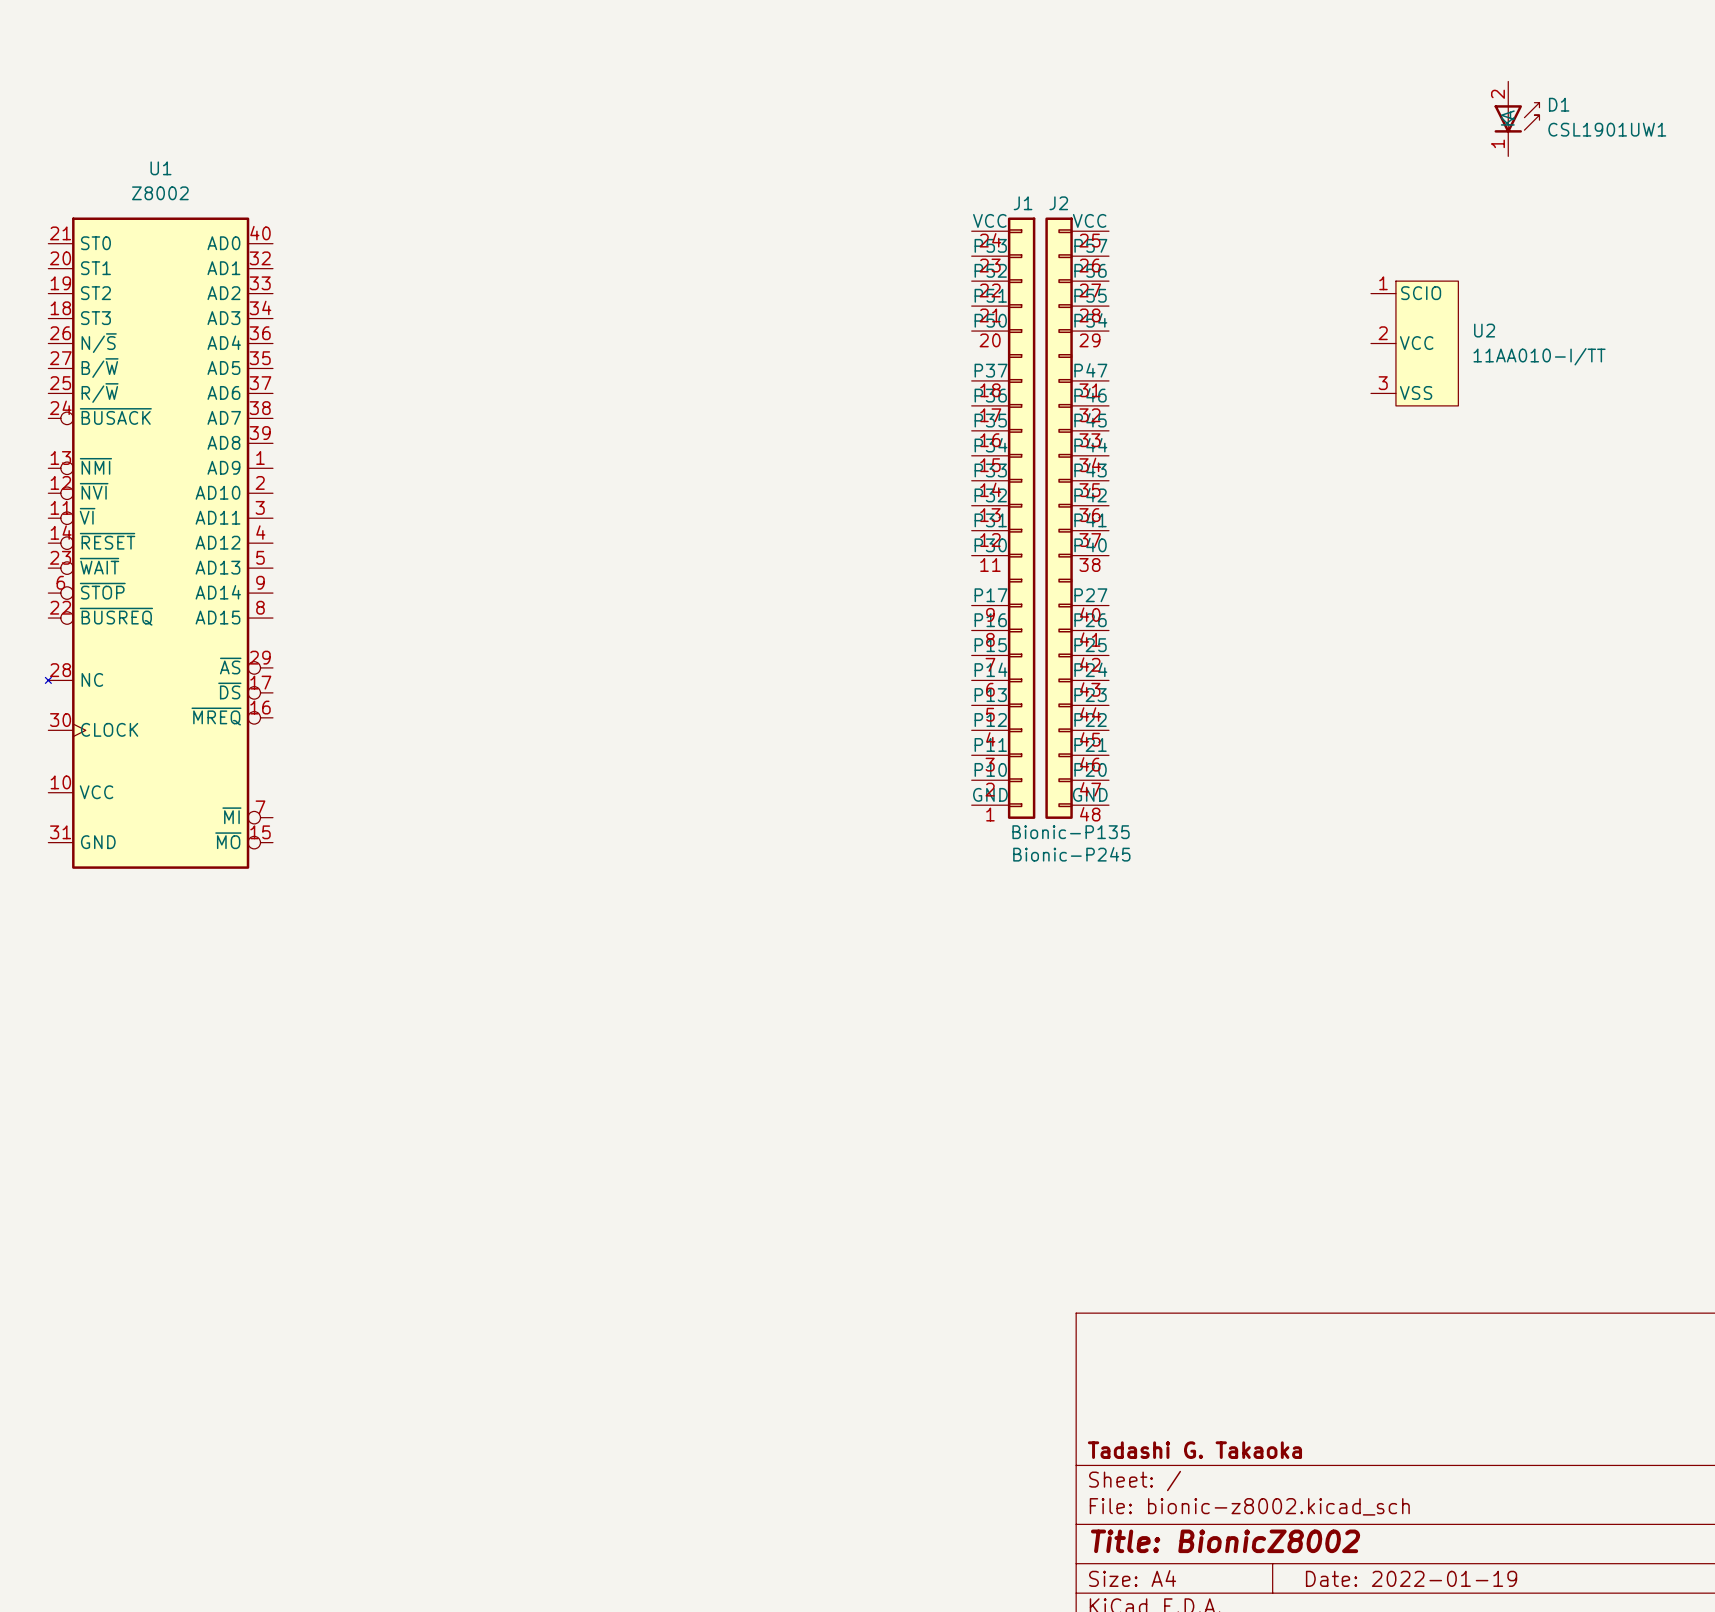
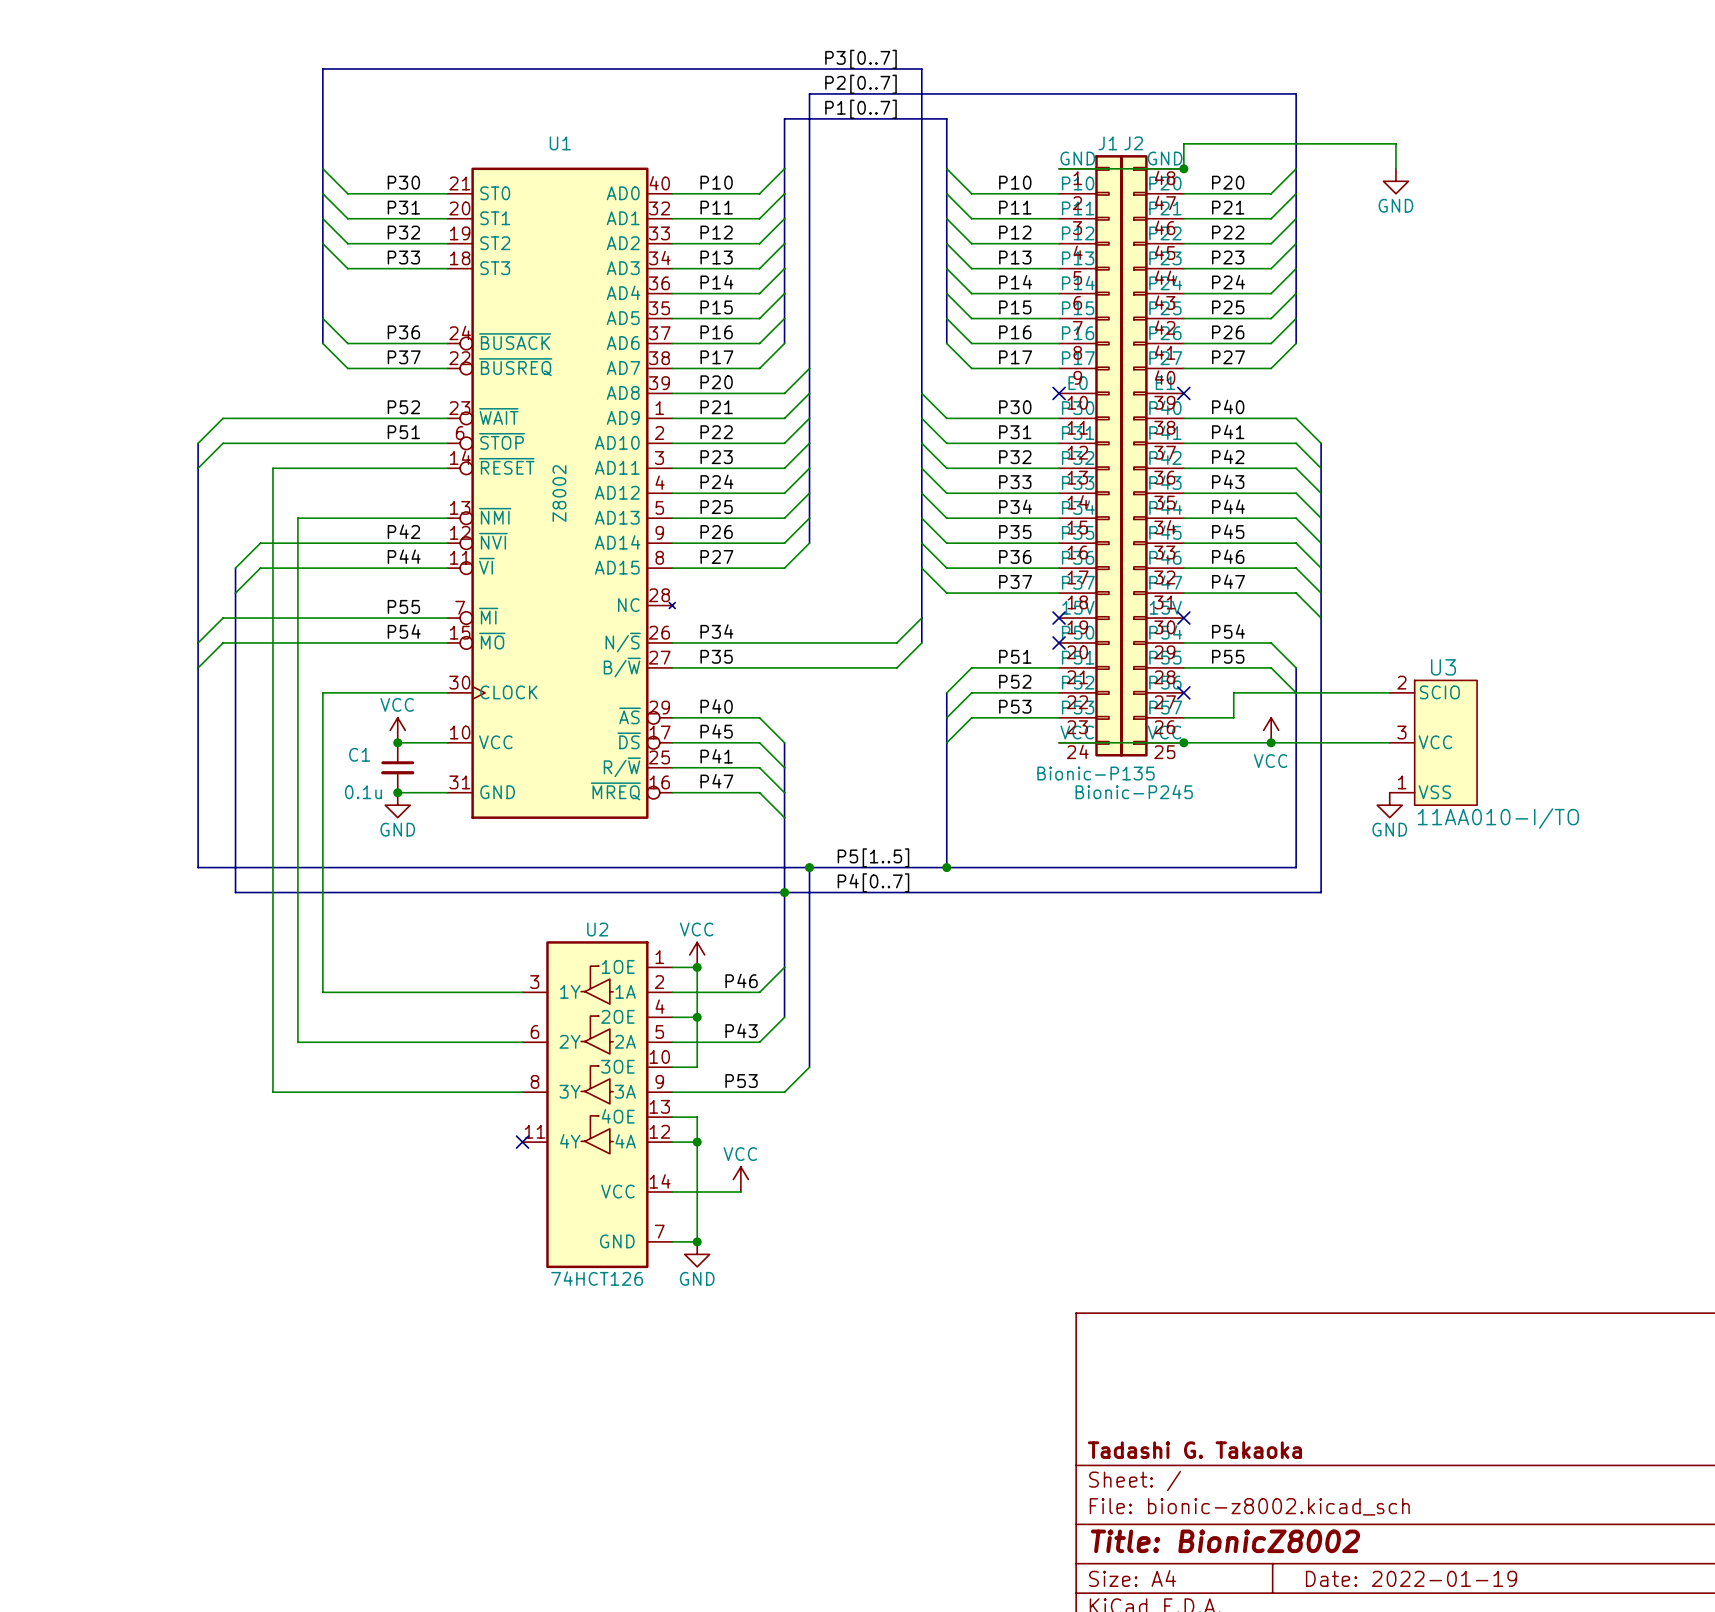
label: none -> P3[0..7] (861, 59)
label: none -> P2[0..7] (861, 84)
label: none -> P1[0..7] (861, 109)
D1: CSL1901UW1 (1516, 118) -> none
U1 name position: U1 (160, 168) -> U1 (560, 143)
wire: none -> (322, 168) (347, 193) (447, 193)
wire: none -> (784, 168) (759, 193) (672, 193)
wire: none -> (946, 168) (971, 193) (1059, 193)
wire: none -> (1059, 168) (1183, 168) (1183, 143) (1395, 143) (1395, 168)
junction: none -> (1183, 168)
wire: none -> (1296, 168) (1271, 193) (1183, 193)
power symbol: none -> GND (1395, 181)
label: none -> P30 (403, 182)
label: none -> P10 (716, 182)
label: none -> P10 (1015, 182)
label: none -> P20 (1228, 182)
U1 value position: Z8002 (160, 193) -> Z8002 (559, 493)
wire: none -> (322, 193) (347, 218) (447, 218)
wire: none -> (784, 193) (759, 218) (672, 218)
wire: none -> (946, 193) (971, 218) (1059, 218)
wire: none -> (1296, 193) (1271, 218) (1183, 218)
label: none -> P31 (403, 207)
label: none -> P11 (716, 207)
label: none -> P11 (1015, 207)
label: none -> P21 (1228, 207)
U1 symbol: [45, 217, 273, 869] -> [447, 167, 676, 819]
J1 symbol: [971, 217, 1036, 819] -> [1059, 155, 1123, 757]
J2 symbol: [1045, 217, 1109, 819] -> [1120, 155, 1184, 757]
wire: none -> (322, 218) (347, 243) (447, 243)
wire: none -> (784, 218) (759, 243) (672, 243)
wire: none -> (946, 218) (971, 243) (1059, 243)
wire: none -> (1296, 218) (1271, 243) (1183, 243)
label: none -> P32 (403, 232)
label: none -> P12 (716, 232)
label: none -> P12 (1015, 232)
label: none -> P22 (1228, 232)
wire: none -> (322, 243) (347, 268) (447, 268)
wire: none -> (784, 243) (759, 268) (672, 268)
wire: none -> (946, 243) (971, 268) (1059, 268)
wire: none -> (1296, 243) (1271, 268) (1183, 268)
label: none -> P33 (403, 257)
label: none -> P13 (716, 257)
label: none -> P13 (1015, 257)
label: none -> P23 (1228, 257)
wire: none -> (784, 268) (759, 293) (672, 293)
wire: none -> (946, 268) (971, 293) (1059, 293)
wire: none -> (1296, 268) (1271, 293) (1183, 293)
U2 symbol: [1371, 281, 1459, 406] -> [522, 941, 673, 1269]
label: none -> P14 (716, 282)
label: none -> P14 (1015, 282)
label: none -> P24 (1228, 282)
wire: none -> (784, 293) (759, 318) (672, 318)
wire: none -> (946, 293) (971, 318) (1059, 318)
wire: none -> (1296, 293) (1271, 318) (1183, 318)
label: none -> P15 (716, 307)
label: none -> P15 (1015, 307)
label: none -> P25 (1228, 307)
wire: none -> (322, 318) (347, 343) (447, 343)
wire: none -> (784, 318) (759, 343) (672, 343)
wire: none -> (946, 318) (971, 343) (1059, 343)
wire: none -> (1296, 318) (1271, 343) (1183, 343)
U2 name position: U2 (1484, 330) -> U2 (597, 929)
label: none -> P36 (403, 332)
label: none -> P16 (716, 332)
label: none -> P16 (1015, 332)
label: none -> P26 (1228, 332)
wire: none -> (322, 343) (347, 368) (447, 368)
bus: none -> (322, 343) (322, 69) (921, 69) (921, 642)
wire: none -> (784, 343) (759, 368) (672, 368)
bus: none -> (784, 343) (784, 118) (946, 118) (946, 343)
wire: none -> (946, 343) (971, 368) (1059, 368)
wire: none -> (1296, 343) (1271, 368) (1183, 368)
bus: none -> (1296, 343) (1296, 93) (809, 93) (809, 543)
U2 value: 11AA010-I/TT (1539, 356) -> 74HCT126 (597, 1278)
label: none -> P37 (404, 357)
label: none -> P17 (716, 357)
label: none -> P17 (1015, 357)
label: none -> P27 (1228, 357)
wire: none -> (809, 368) (784, 393) (672, 393)
label: none -> P20 (716, 382)
wire: none -> (809, 393) (784, 418) (672, 418)
wire: none -> (921, 393) (946, 418) (1059, 418)
no-connect mark: none -> (1059, 393)
no-connect mark: none -> (1183, 393)
label: none -> P40 (1228, 406)
label: none -> P52 (403, 407)
label: none -> P21 (716, 407)
label: none -> P30 (1015, 407)
wire: none -> (447, 418) (223, 418) (198, 443)
wire: none -> (809, 418) (784, 443) (672, 443)
wire: none -> (921, 418) (946, 443) (1059, 443)
wire: none -> (1183, 418) (1296, 418) (1321, 443)
label: none -> P41 (1228, 431)
label: none -> P51 (403, 432)
label: none -> P22 (716, 432)
label: none -> P31 (1015, 432)
bus: none -> (198, 443) (198, 867) (1296, 867) (1296, 667)
wire: none -> (447, 443) (223, 443) (198, 468)
wire: none -> (809, 443) (784, 468) (672, 468)
wire: none -> (921, 443) (946, 468) (1059, 468)
wire: none -> (1183, 443) (1296, 443) (1321, 468)
bus: none -> (1321, 443) (1321, 892) (235, 892) (235, 568)
label: none -> P42 (1228, 456)
label: none -> P23 (716, 457)
label: none -> P32 (1015, 457)
wire: none -> (447, 468) (272, 468) (272, 1092) (522, 1092)
wire: none -> (809, 468) (784, 493) (672, 493)
wire: none -> (921, 468) (946, 493) (1059, 493)
wire: none -> (1183, 468) (1296, 468) (1321, 493)
label: none -> P24 (716, 481)
label: none -> P43 (1228, 481)
label: none -> P33 (1015, 482)
wire: none -> (809, 493) (784, 518) (672, 518)
wire: none -> (921, 493) (946, 518) (1059, 518)
wire: none -> (1183, 493) (1296, 493) (1321, 518)
label: none -> P34 (1015, 506)
label: none -> P44 (1228, 506)
label: none -> P25 (716, 507)
wire: none -> (447, 518) (297, 518) (297, 1042) (522, 1042)
wire: none -> (809, 518) (784, 543) (672, 543)
wire: none -> (921, 518) (946, 543) (1059, 543)
wire: none -> (1183, 518) (1296, 518) (1321, 543)
label: none -> P42 (403, 531)
label: none -> P45 (1228, 531)
label: none -> P26 (716, 532)
label: none -> P35 (1015, 532)
wire: none -> (447, 543) (260, 543) (235, 568)
wire: none -> (809, 543) (784, 568) (672, 568)
wire: none -> (921, 543) (946, 568) (1059, 568)
wire: none -> (1183, 543) (1296, 543) (1321, 568)
label: none -> P44 (404, 556)
label: none -> P27 (716, 556)
label: none -> P36 (1015, 556)
label: none -> P46 (1228, 556)
wire: none -> (447, 568) (260, 568) (235, 593)
wire: none -> (921, 568) (946, 593) (1059, 593)
wire: none -> (1183, 568) (1296, 568) (1321, 593)
label: none -> P37 (1015, 581)
label: none -> P47 (1228, 581)
wire: none -> (1183, 593) (1296, 593) (1321, 618)
label: none -> P55 (403, 606)
wire: none -> (447, 618) (223, 618) (198, 642)
wire: none -> (921, 618) (896, 642) (672, 642)
no-connect mark: none -> (1059, 618)
no-connect mark: none -> (1183, 618)
label: none -> P54 (404, 631)
label: none -> P34 (716, 631)
label: none -> P54 (1228, 631)
wire: none -> (447, 642) (223, 642) (198, 667)
wire: none -> (921, 642) (896, 667) (672, 667)
no-connect mark: none -> (1059, 642)
wire: none -> (1183, 642) (1271, 642) (1296, 667)
label: none -> P35 (716, 656)
label: none -> P51 (1015, 656)
label: none -> P55 (1228, 656)
wire: none -> (1059, 667) (971, 667) (946, 692)
wire: none -> (1183, 667) (1271, 667) (1296, 692)
label: none -> P52 (1015, 681)
wire: none -> (447, 692) (322, 692) (322, 992) (522, 992)
bus: none -> (946, 692) (946, 867)
wire: none -> (1059, 692) (971, 692) (946, 717)
no-connect mark: none -> (1183, 692)
wire: none -> (1389, 692) (1233, 692) (1233, 717) (1183, 717)
label: none -> P40 (716, 706)
label: none -> P53 (1015, 706)
wire: none -> (672, 717) (759, 717) (784, 742)
wire: none -> (1059, 717) (971, 717) (946, 742)
power symbol: none -> VCC (397, 730)
power symbol: none -> VCC (1271, 730)
label: none -> P45 (716, 731)
wire: none -> (397, 742) (447, 742)
junction: none -> (397, 742)
wire: none -> (672, 742) (759, 742) (784, 767)
bus: none -> (784, 742) (784, 1017)
wire: none -> (1059, 742) (1389, 742)
junction: none -> (1183, 742)
junction: none -> (1271, 742)
U3: none -> 11AA010-I/TO (1433, 742)
label: none -> P41 (716, 756)
C1: none -> 0.1u (397, 767)
wire: none -> (672, 767) (759, 767) (784, 792)
label: none -> P47 (716, 781)
wire: none -> (397, 792) (447, 792)
junction: none -> (397, 792)
wire: none -> (672, 792) (759, 792) (784, 817)
power symbol: none -> GND (397, 805)
power symbol: none -> GND (1389, 805)
J1 value position: Bionic-P135 (1071, 832) -> Bionic-P135 (1095, 773)
label: none -> P5[1..5] (873, 857)
bus: none -> (809, 867) (809, 1067)
junction: none -> (809, 867)
junction: none -> (946, 867)
label: none -> P4[0..7] (873, 882)
junction: none -> (784, 892)
power symbol: none -> VCC (697, 954)
wire: none -> (672, 967) (697, 967) (697, 1067) (672, 1067)
junction: none -> (697, 967)
wire: none -> (784, 967) (759, 992) (672, 992)
label: none -> P46 (741, 980)
wire: none -> (672, 1017) (697, 1017)
junction: none -> (697, 1017)
wire: none -> (784, 1017) (759, 1042) (672, 1042)
label: none -> P43 (741, 1030)
wire: none -> (809, 1067) (784, 1092) (672, 1092)
label: none -> P53 (741, 1081)
wire: none -> (672, 1117) (697, 1117) (697, 1241) (672, 1241)
no-connect mark: none -> (522, 1142)
wire: none -> (672, 1142) (697, 1142)
junction: none -> (697, 1142)
power symbol: none -> VCC (740, 1179)
wire: none -> (672, 1192) (740, 1192)
junction: none -> (697, 1241)
power symbol: none -> GND (697, 1254)

